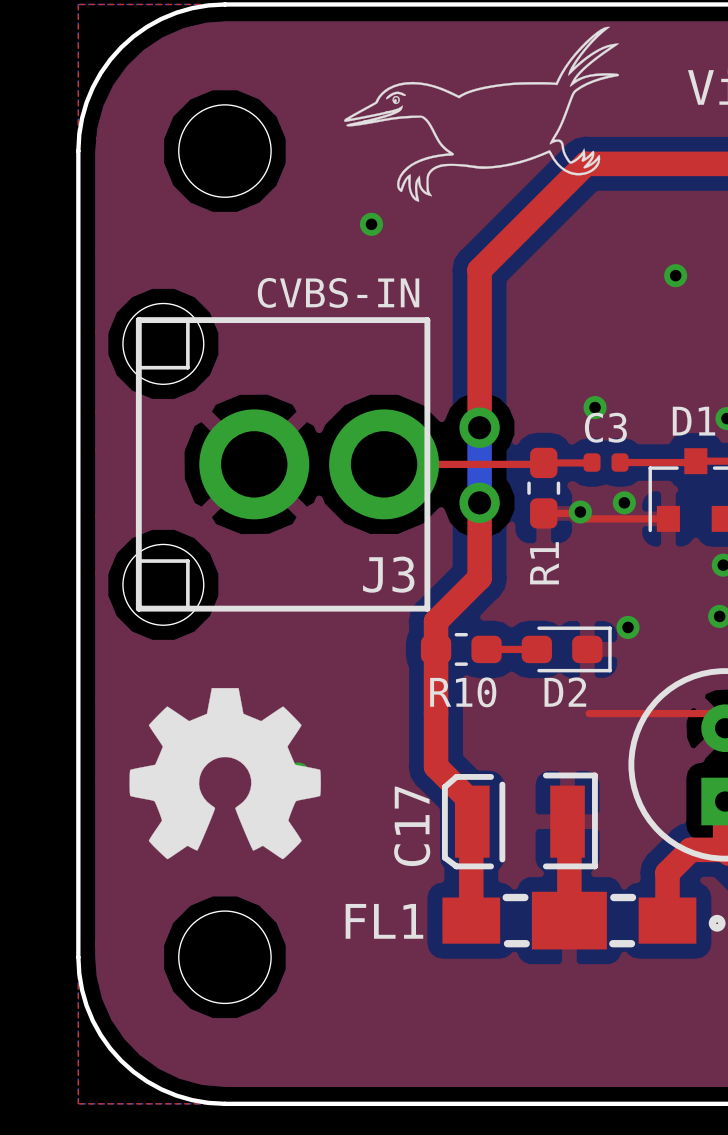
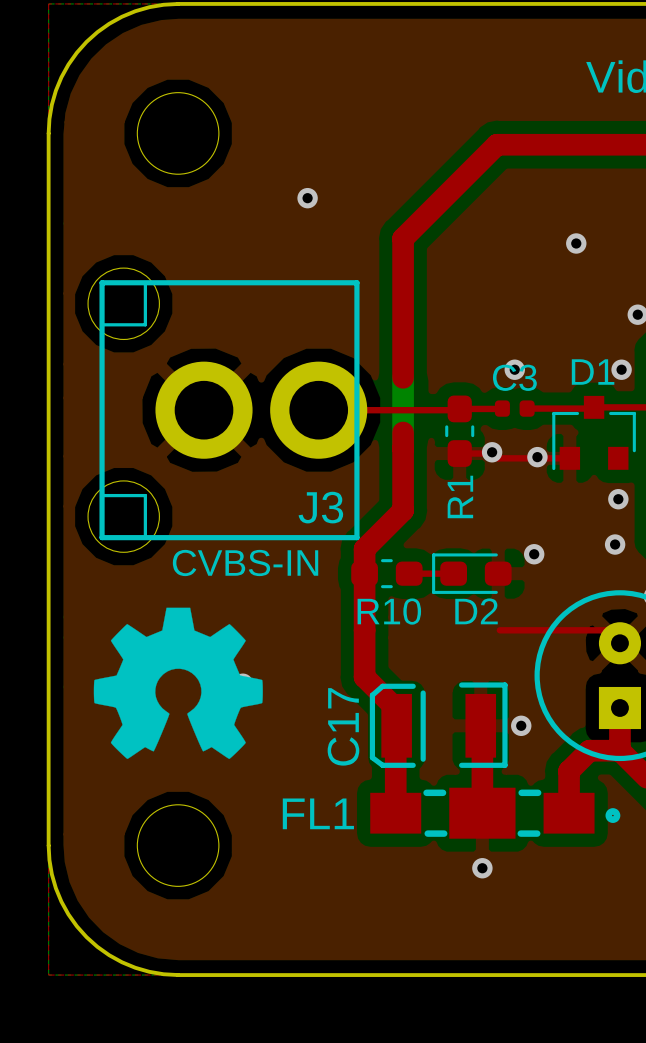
drawing: [344, 26, 619, 202] -> none
text position: CVBS-IN (338, 292) -> CVBS-IN (245, 562)
via position: (595, 407) -> (514, 369)
via: (479, 427) -> none
top track: none -> (403, 432) (403, 444)
via: (479, 502) -> none
via position: (624, 502) -> (537, 457)
D2 rotation: 0° (566, 649) -> 180° (471, 573)
via: none -> (521, 725)
via: none -> (482, 868)

